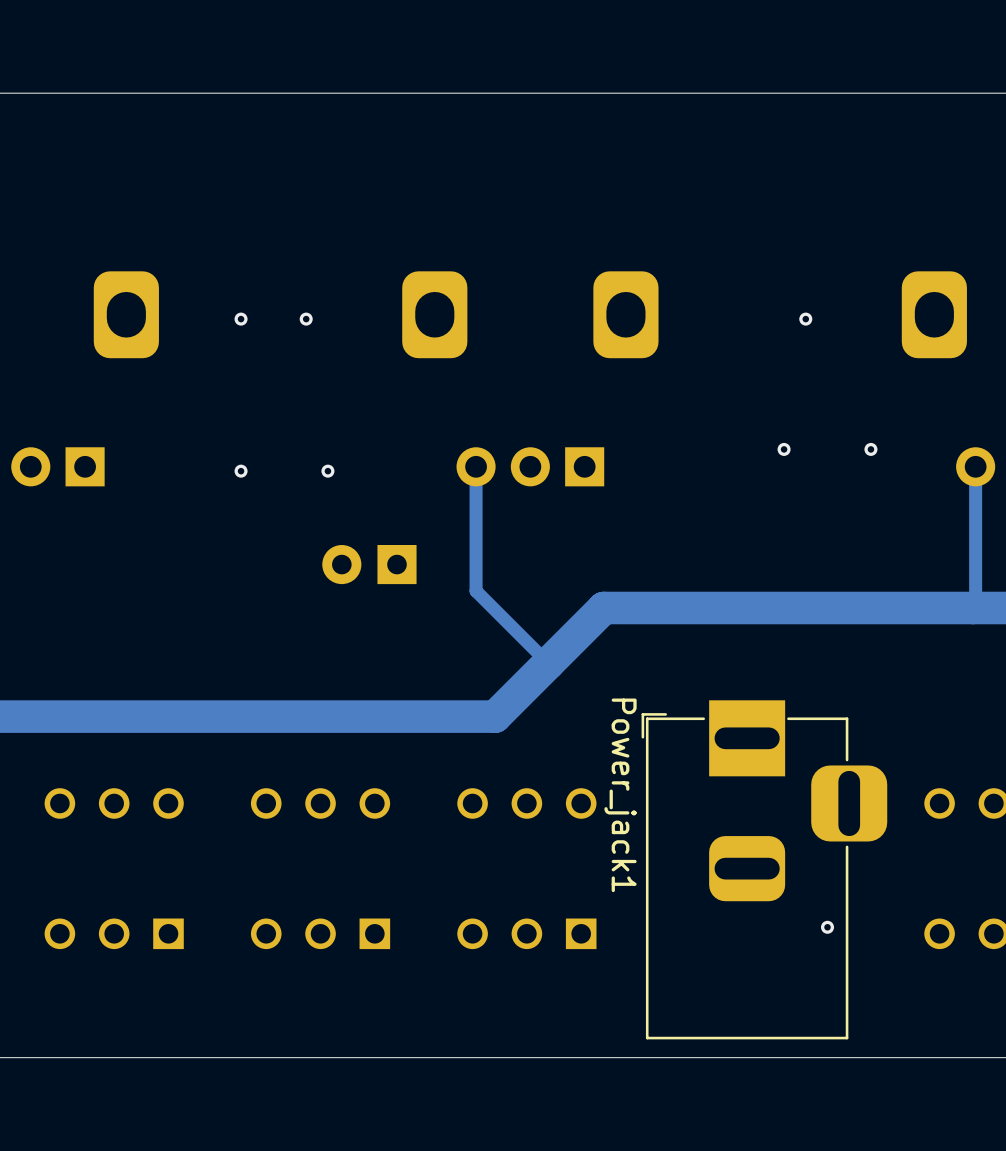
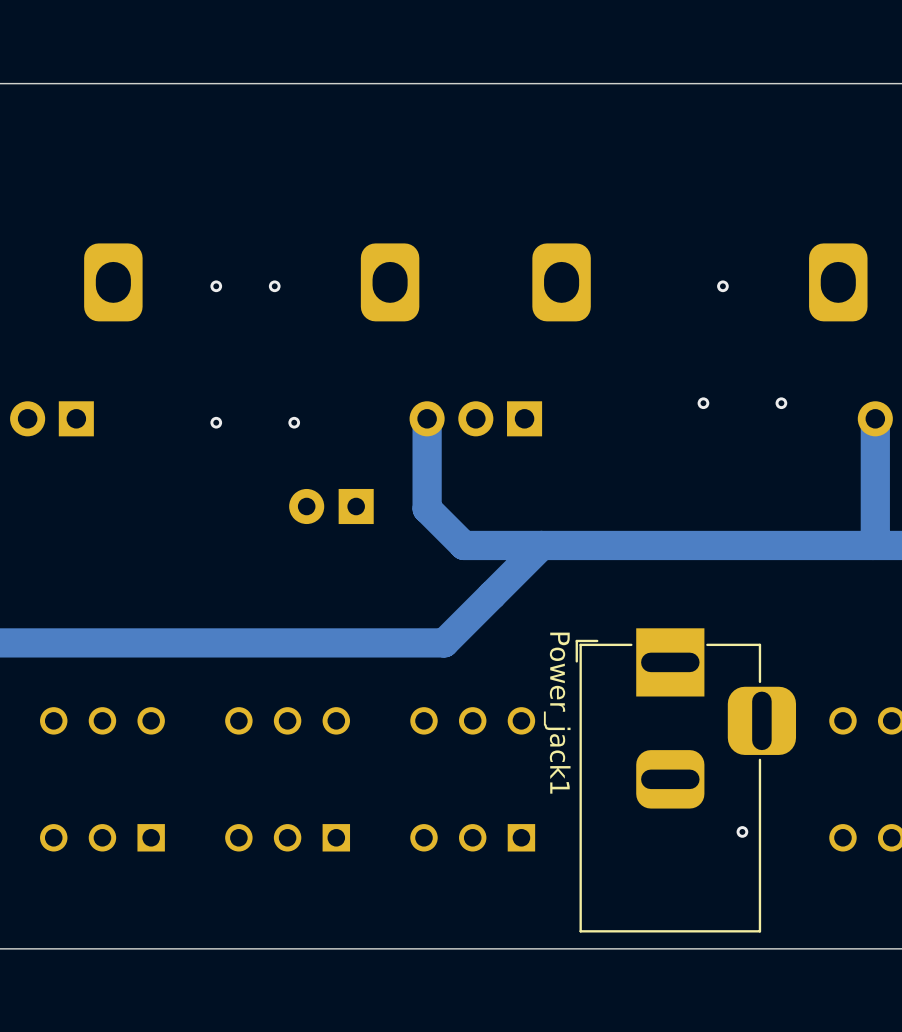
track width: thin (476, 466) (476, 567) -> thick (427, 418) (427, 508)
track width: thin (975, 466) (975, 605) -> thick (875, 418) (875, 543)
track: (476, 567) (476, 591) (548, 663) -> (427, 508) (463, 545) (541, 545)

